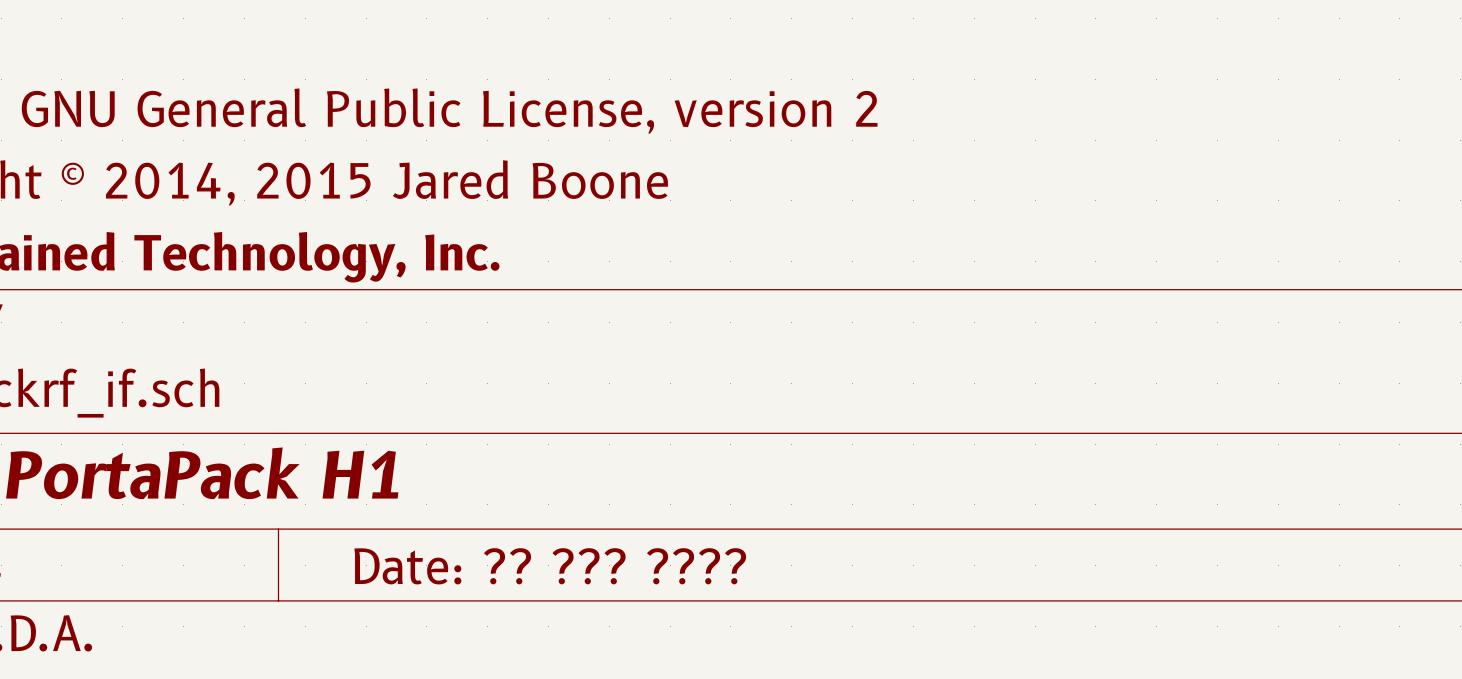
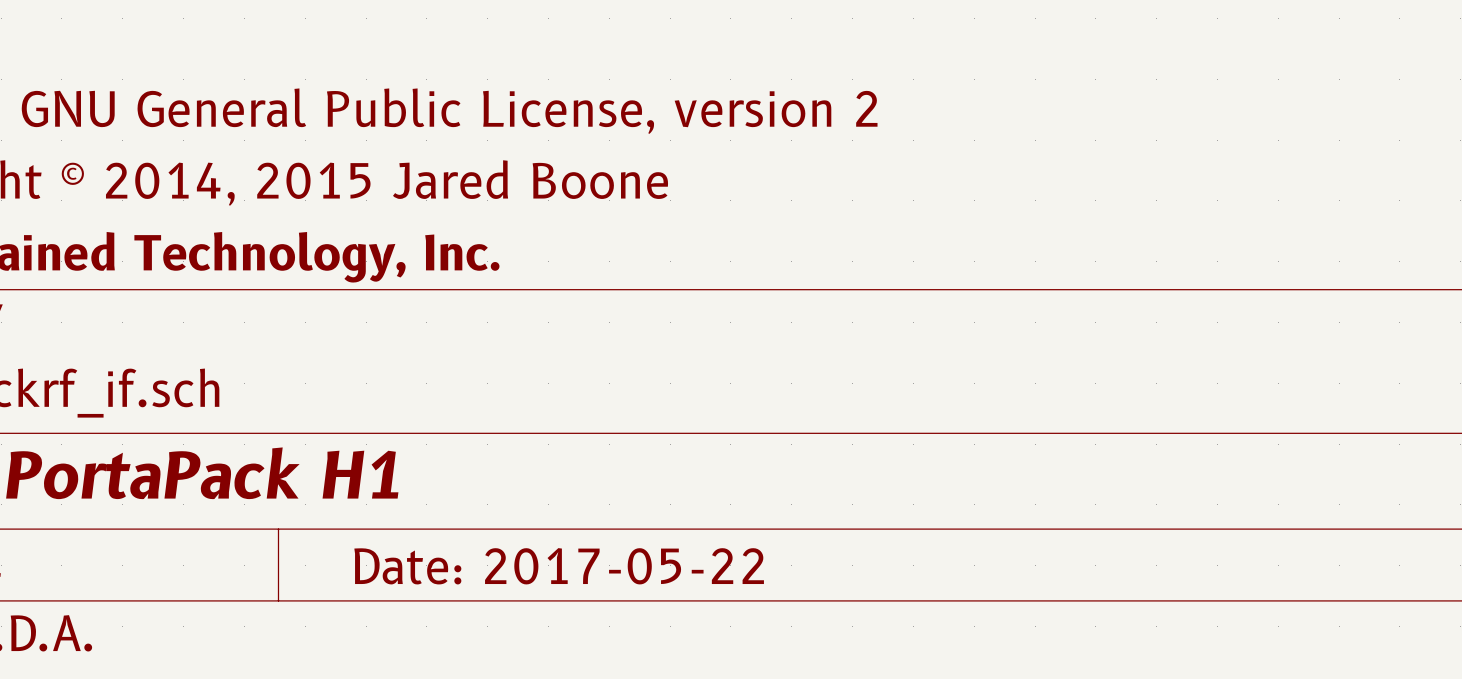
title block: Date: ?? ??? ???? (550, 566) -> Date: 2017-05-22 (559, 566)

